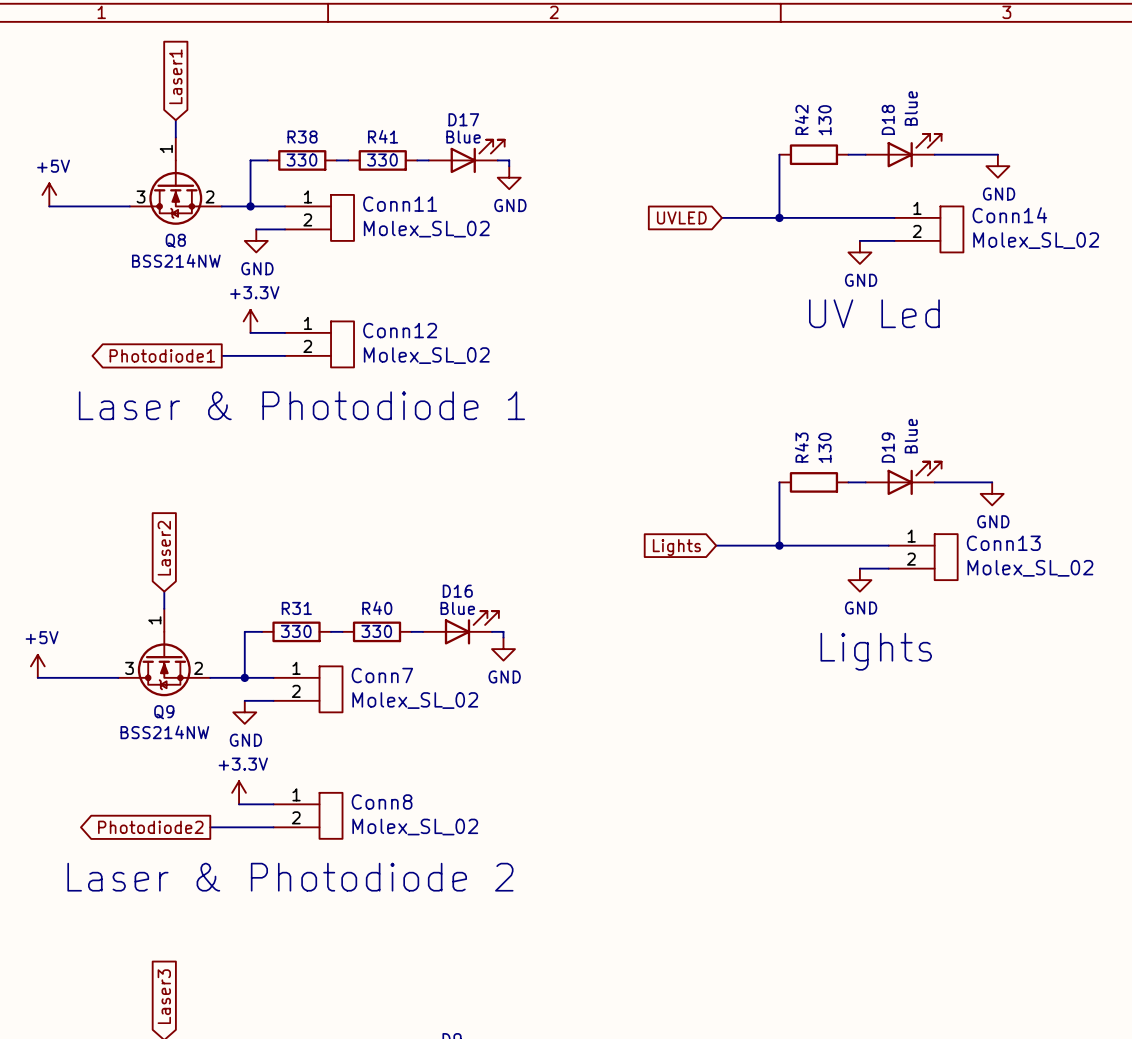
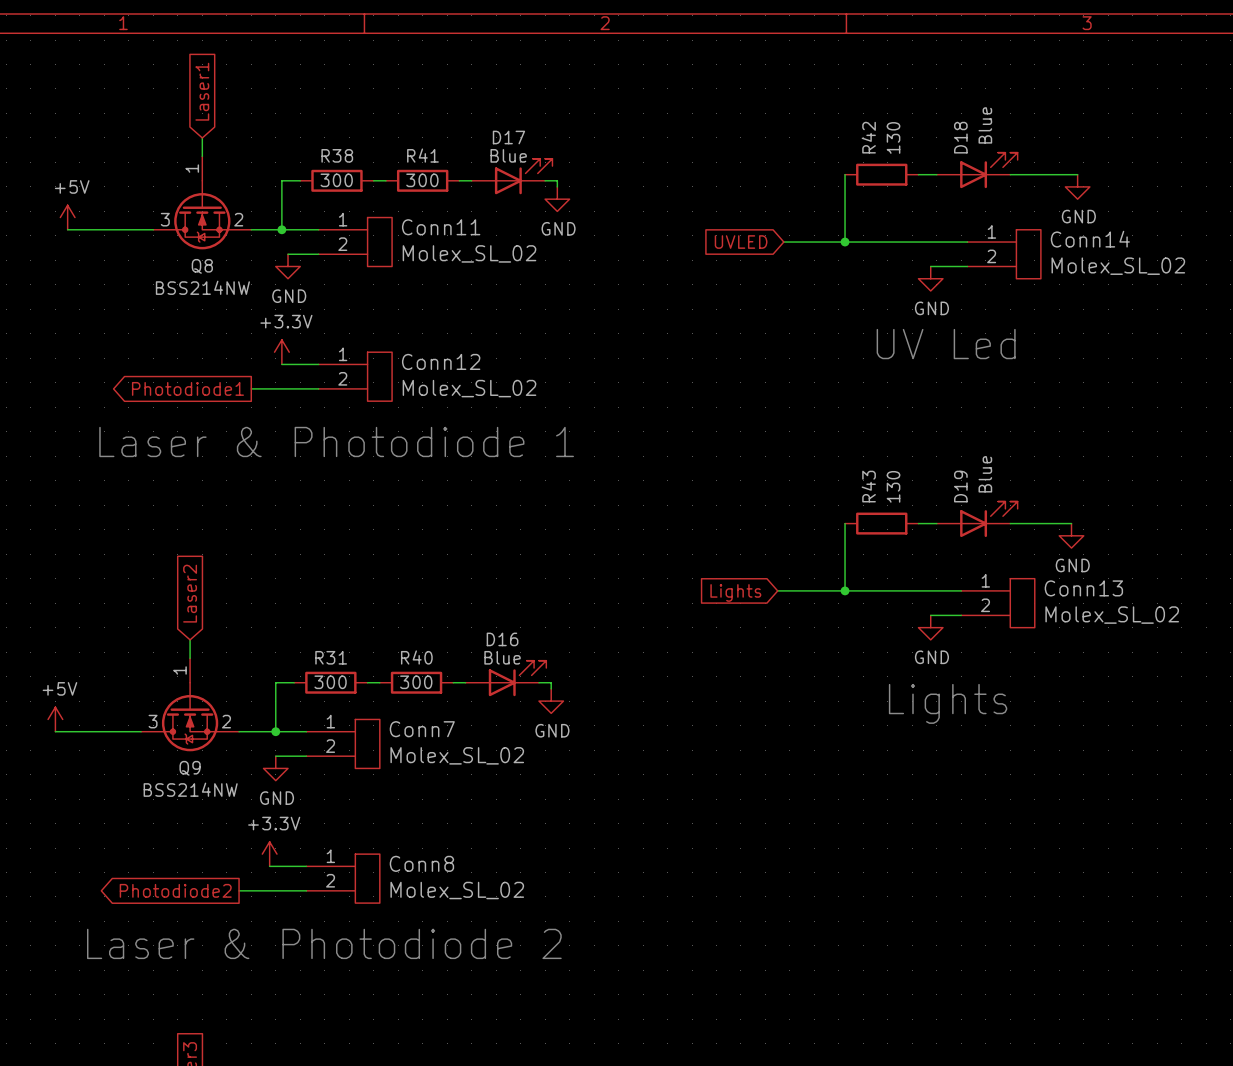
R38 value: 330 (302, 160) -> 300 (336, 180)
R41 value: 330 (382, 160) -> 300 (422, 180)
R31 value: 330 (296, 631) -> 300 (330, 682)
R40 value: 330 (376, 631) -> 300 (416, 682)

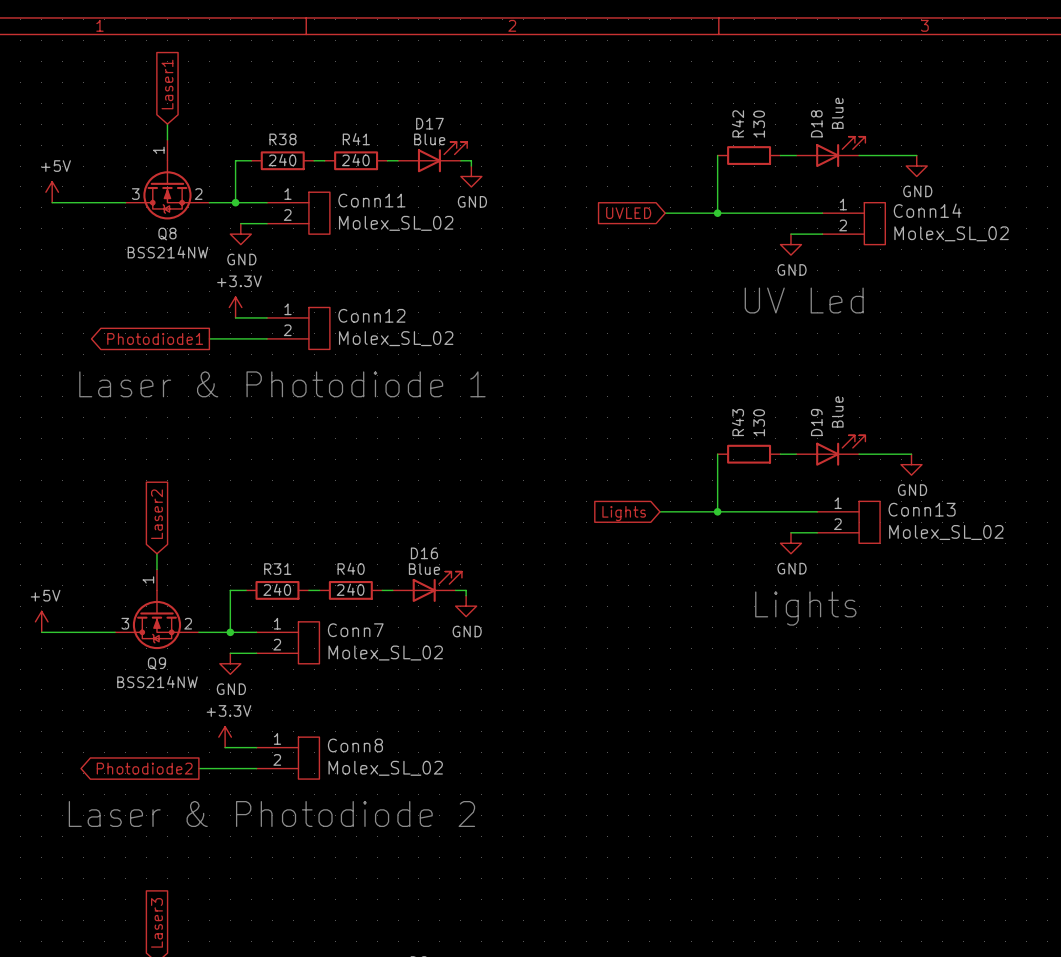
R38 value: 300 (336, 180) -> 240 (282, 160)
R41 value: 300 (422, 180) -> 240 (355, 160)
R31 value: 300 (330, 682) -> 240 (277, 589)
R40 value: 300 (416, 682) -> 240 (350, 589)

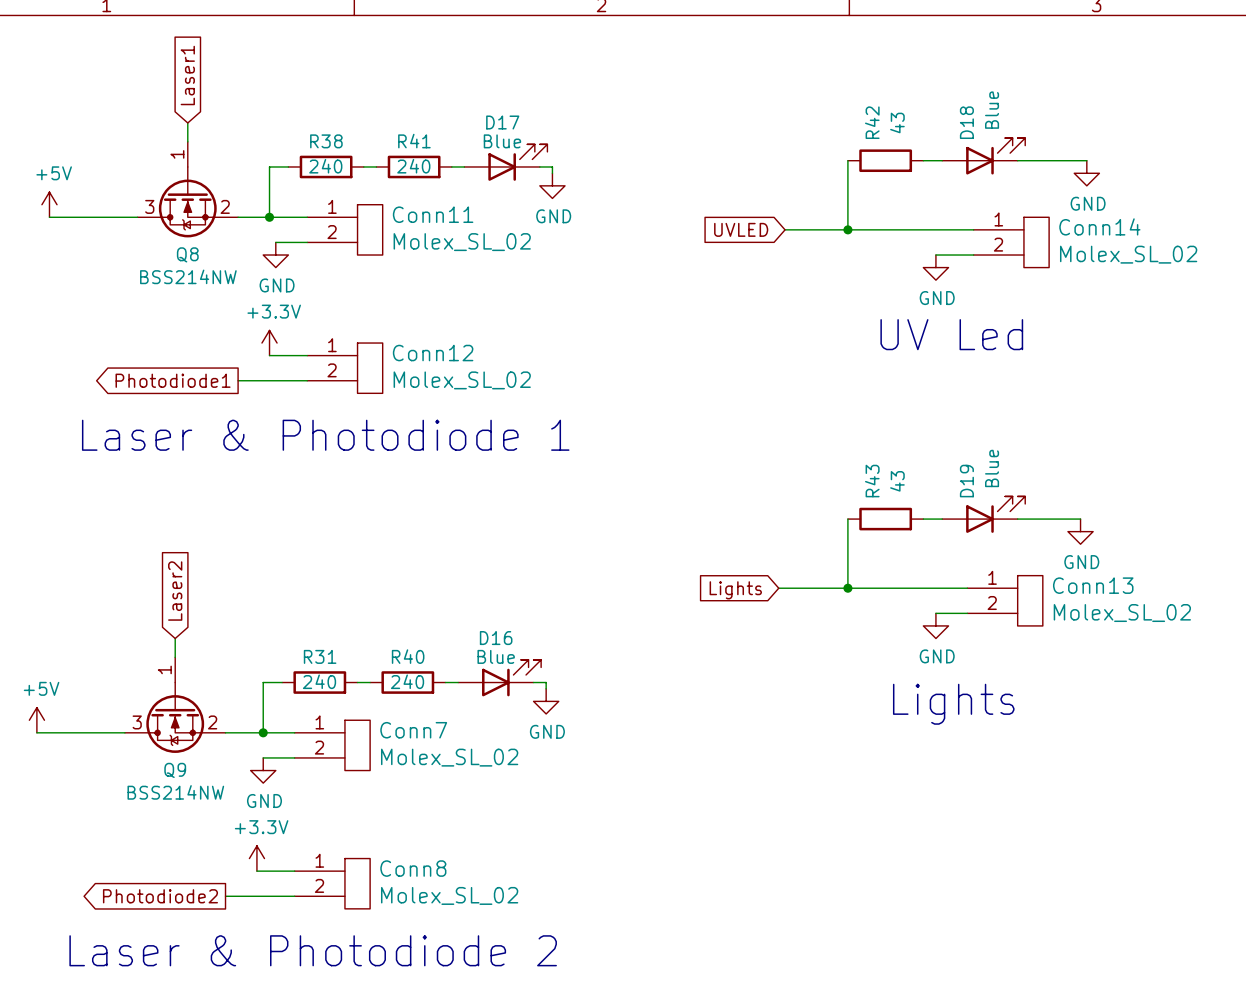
R42 value: 130 (759, 124) -> 43 (897, 122)
R43 value: 130 (759, 422) -> 43 (897, 481)

